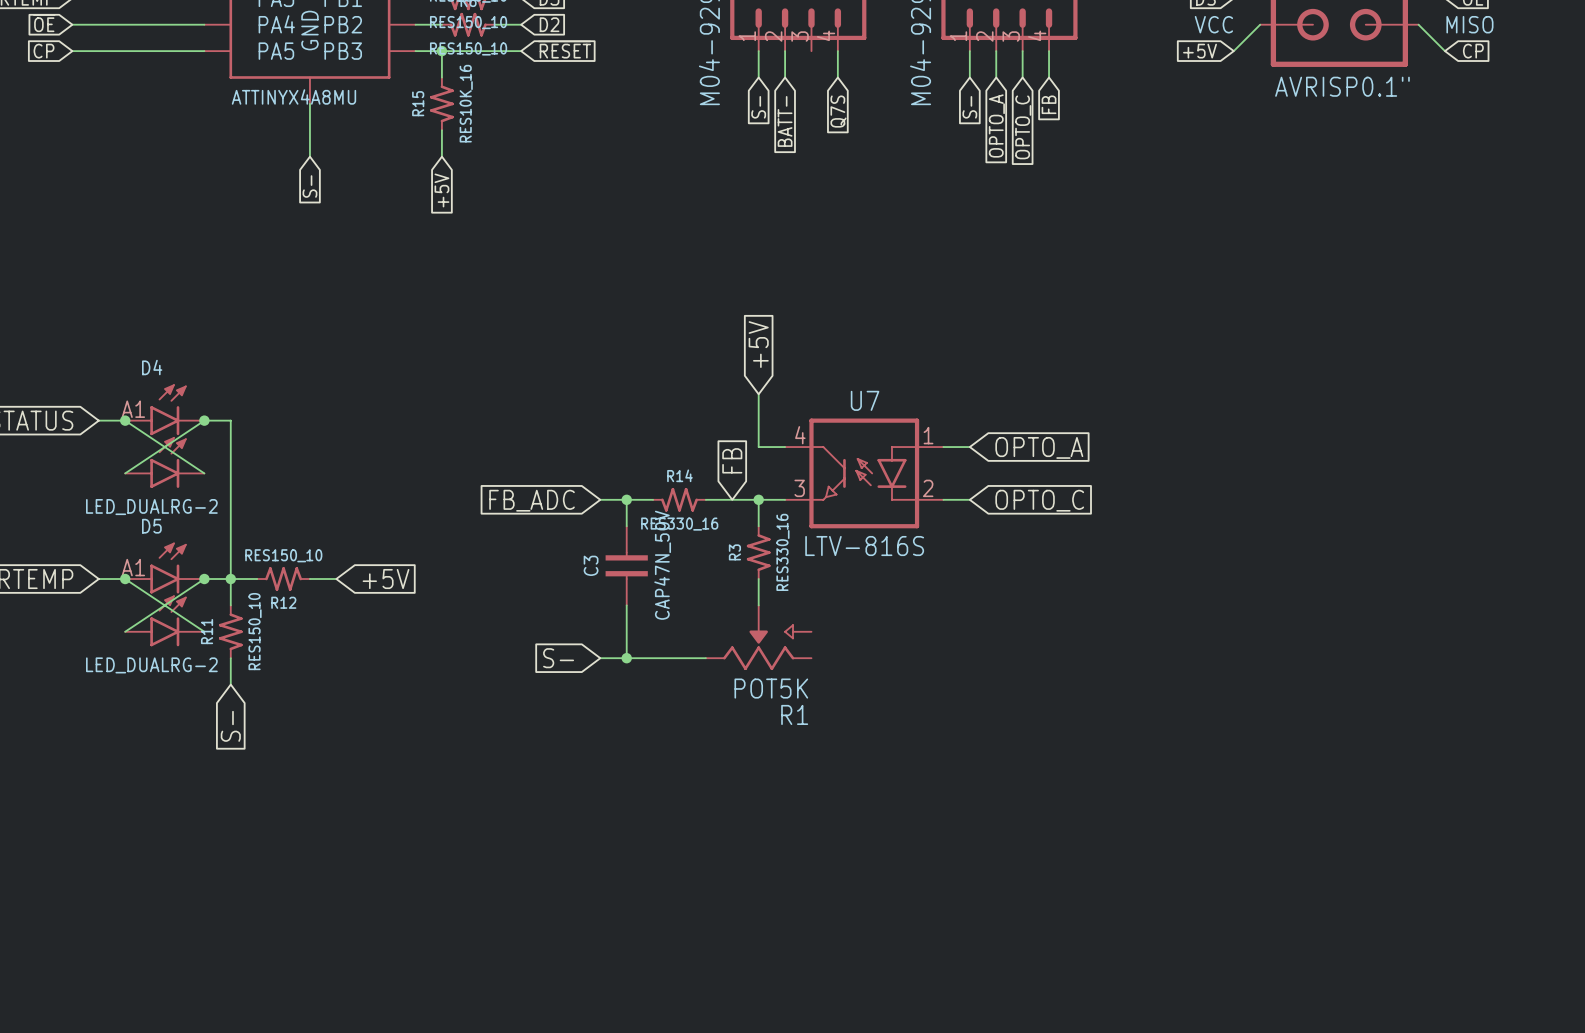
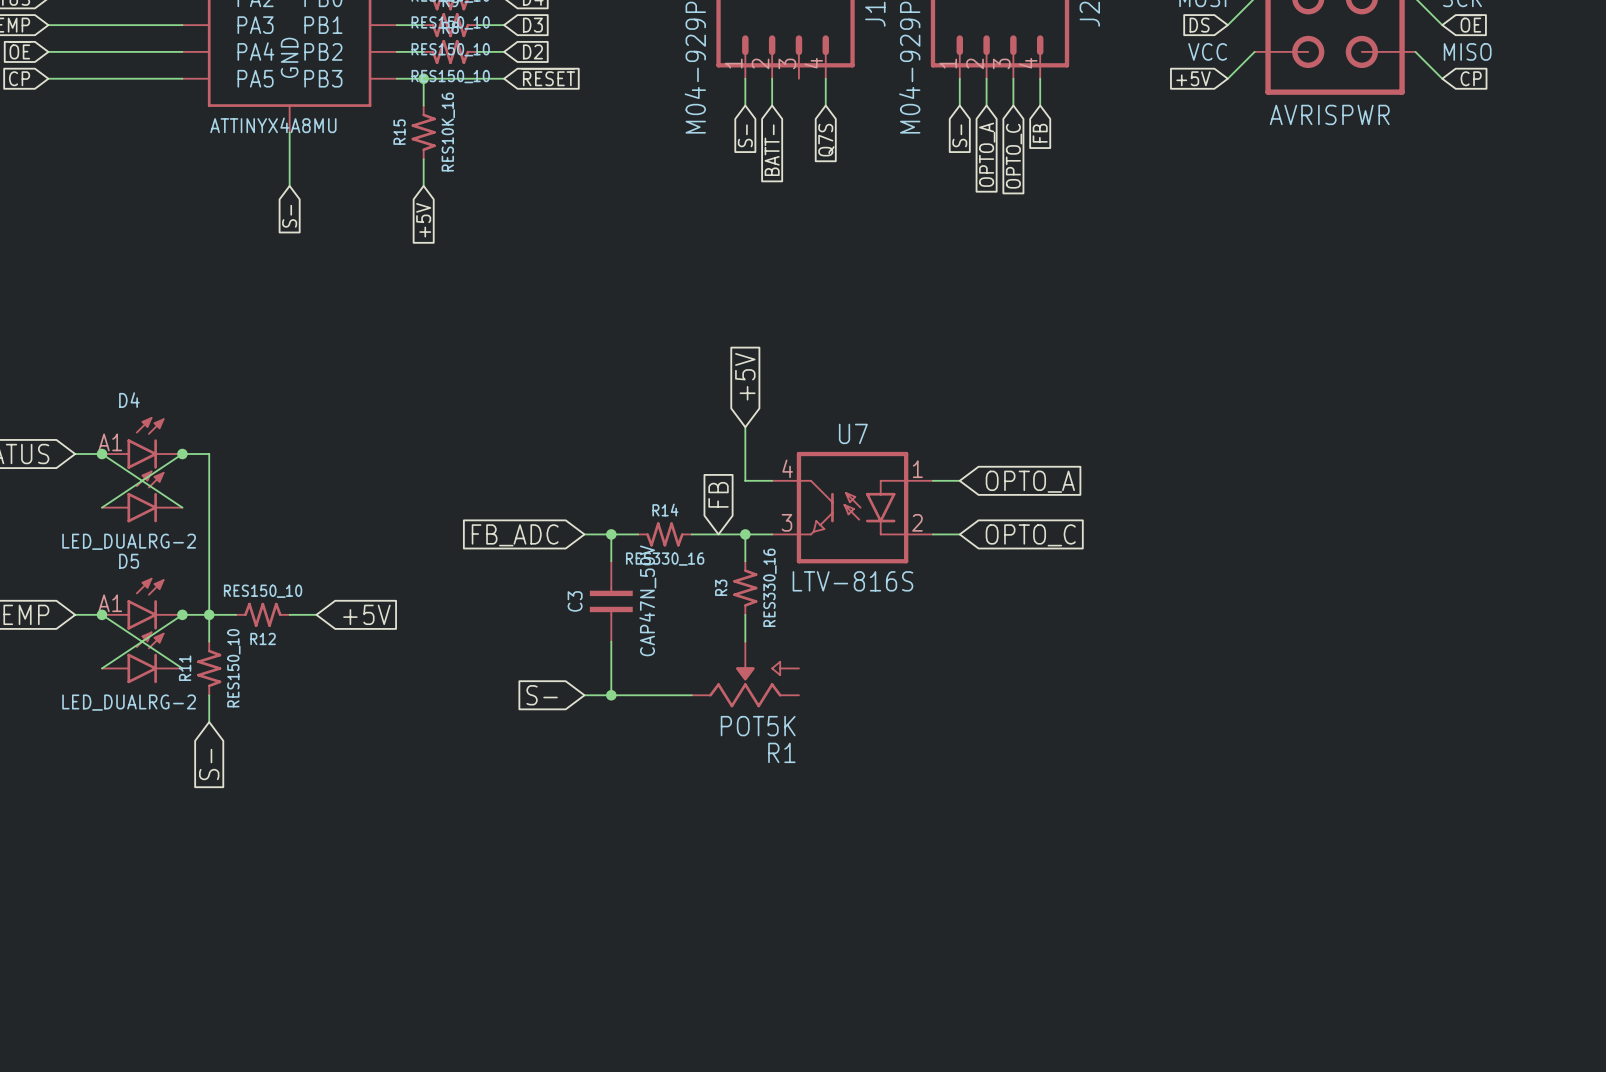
part value: AVRISP0.1" (1342, 86) -> AVRISPWR (1329, 114)

